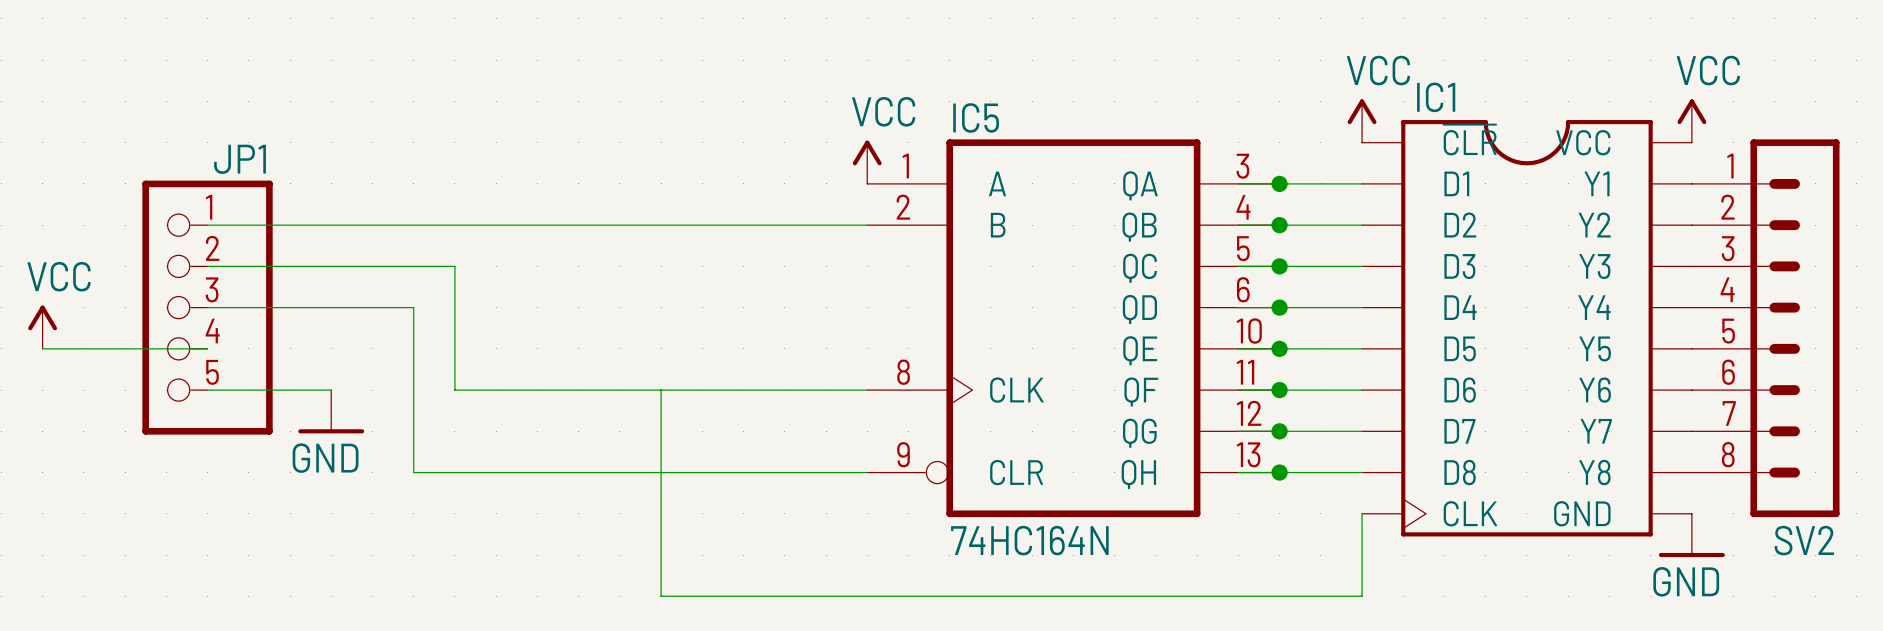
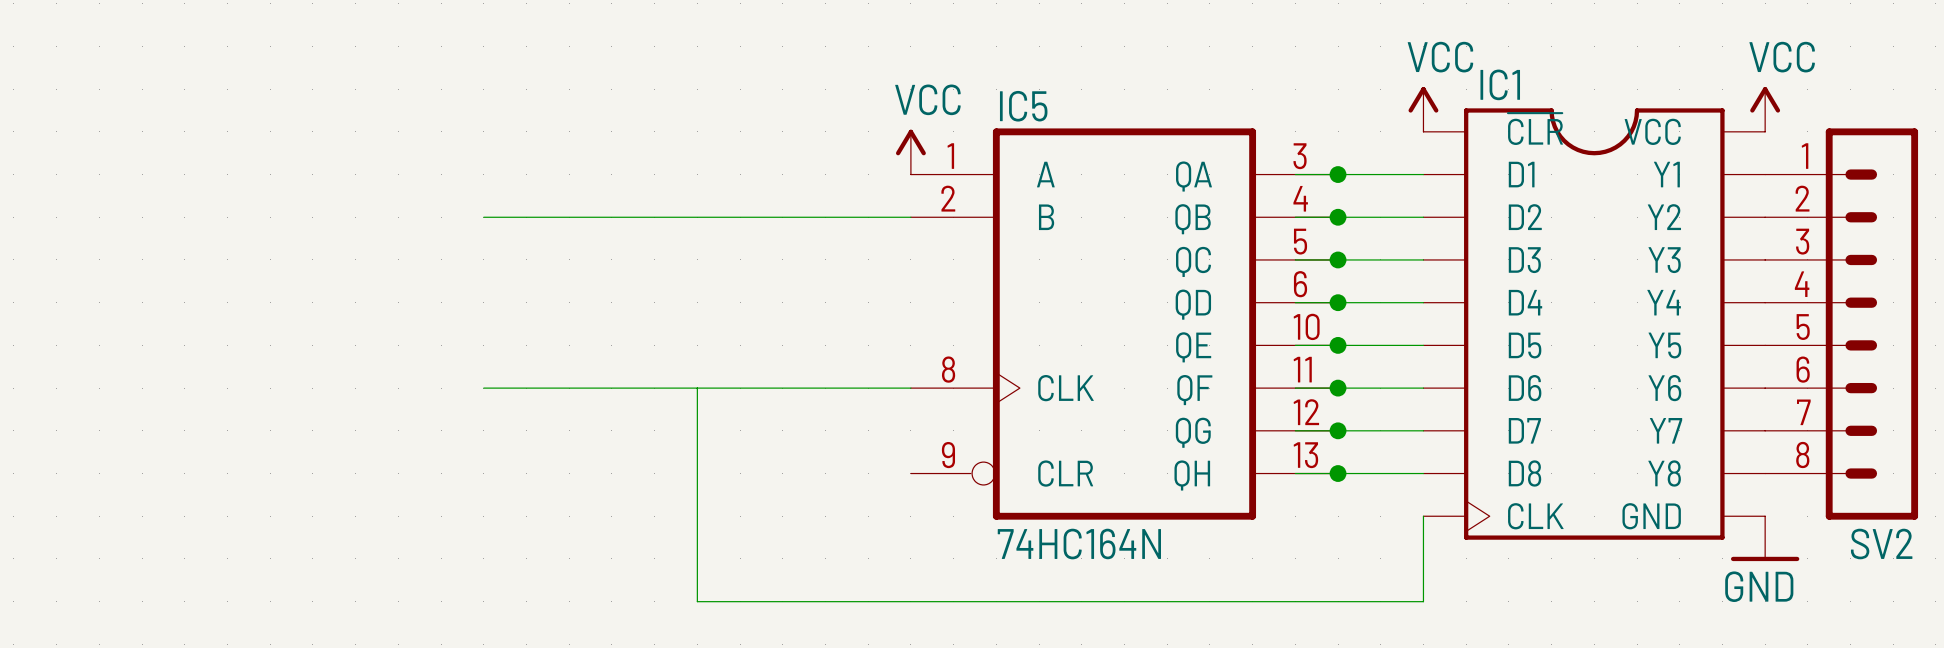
wire: (207, 225) (454, 225) -> none
wire: (207, 266) (454, 266) (454, 390) -> none
wire: (207, 307) (413, 307) (413, 472) (867, 472) -> none
JP1: (207, 307) -> none
power symbol: VCC (42, 327) -> none
wire: (42, 348) (207, 348) -> none
wire: (207, 390) (331, 390) -> none
power symbol: GND (331, 411) -> none

